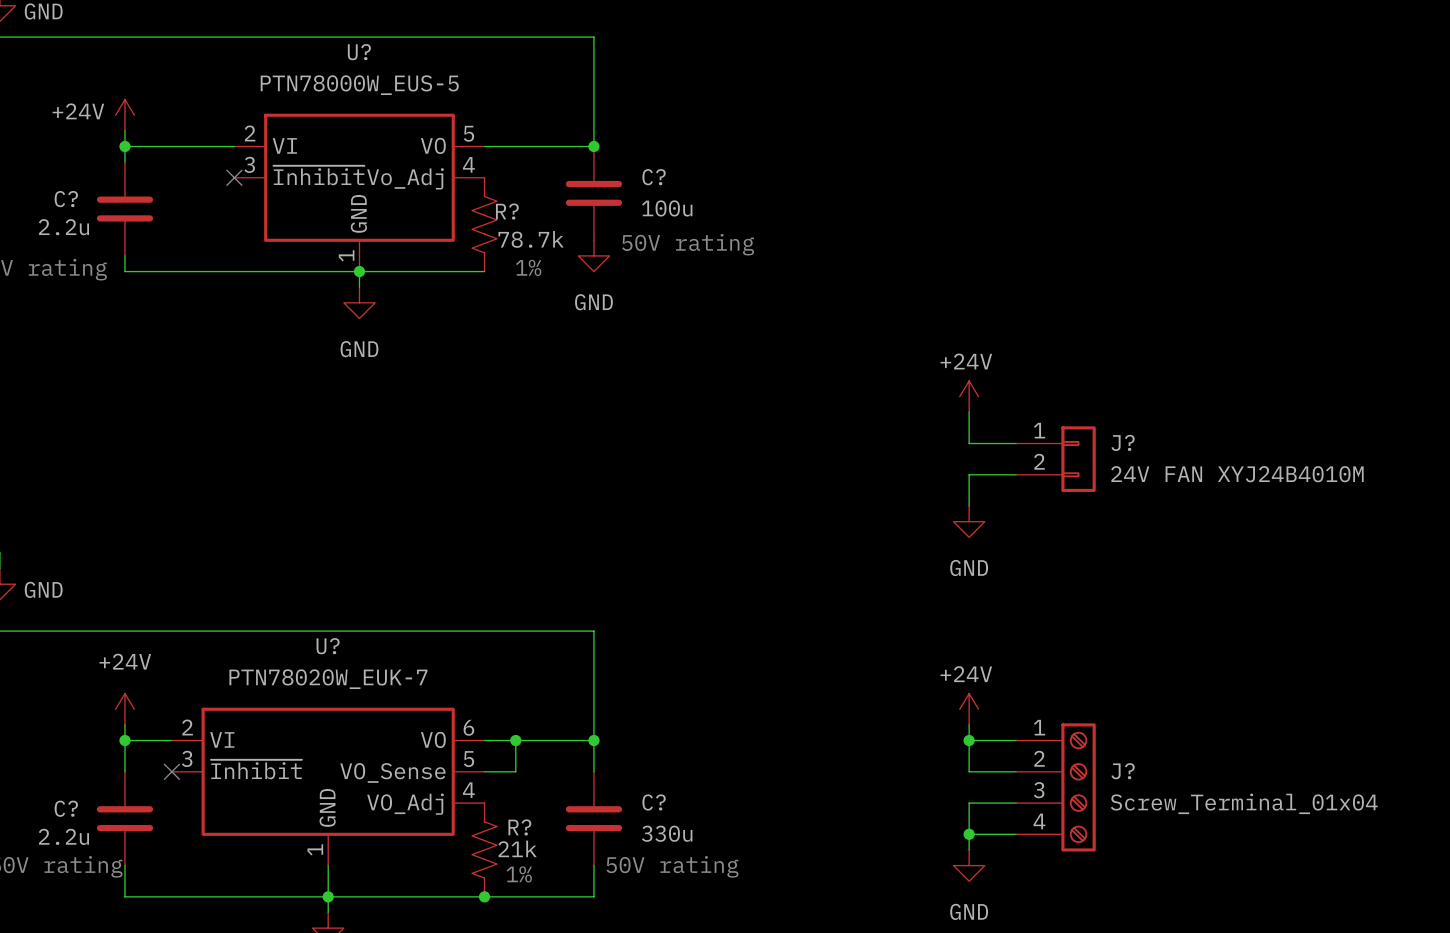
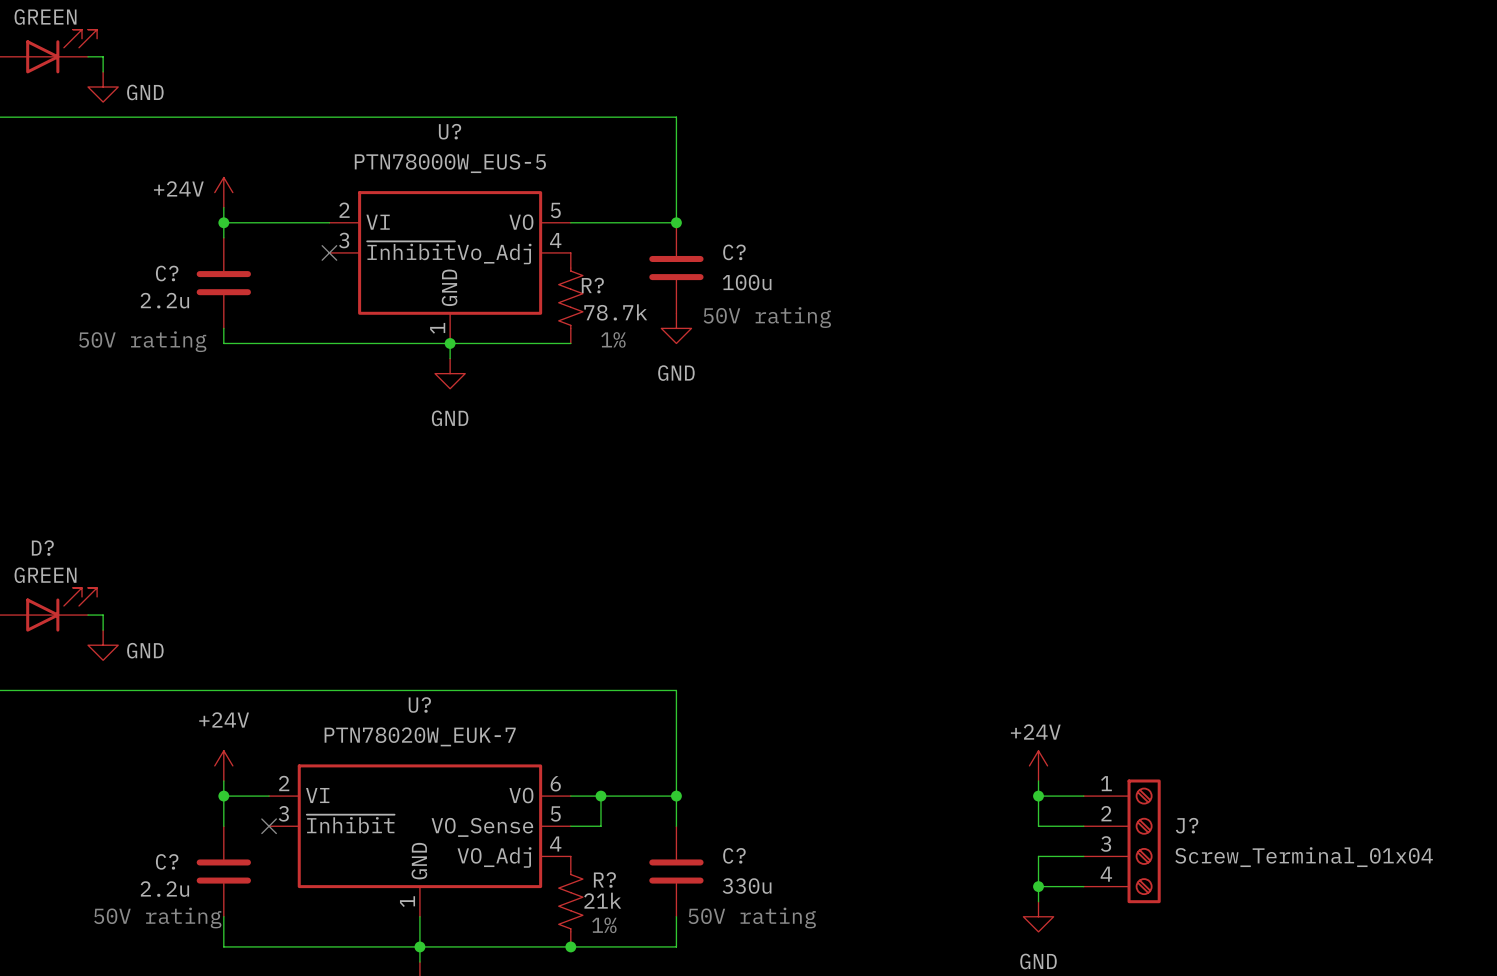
power symbol: +24V (969, 396) -> none
wire: (969, 412) (969, 443) (1016, 443) -> none
J?: 24V FAN XYJ24B4010M (1055, 459) -> none
wire: (1016, 474) (969, 474) (969, 506) -> none
power symbol: GND (969, 521) -> none

